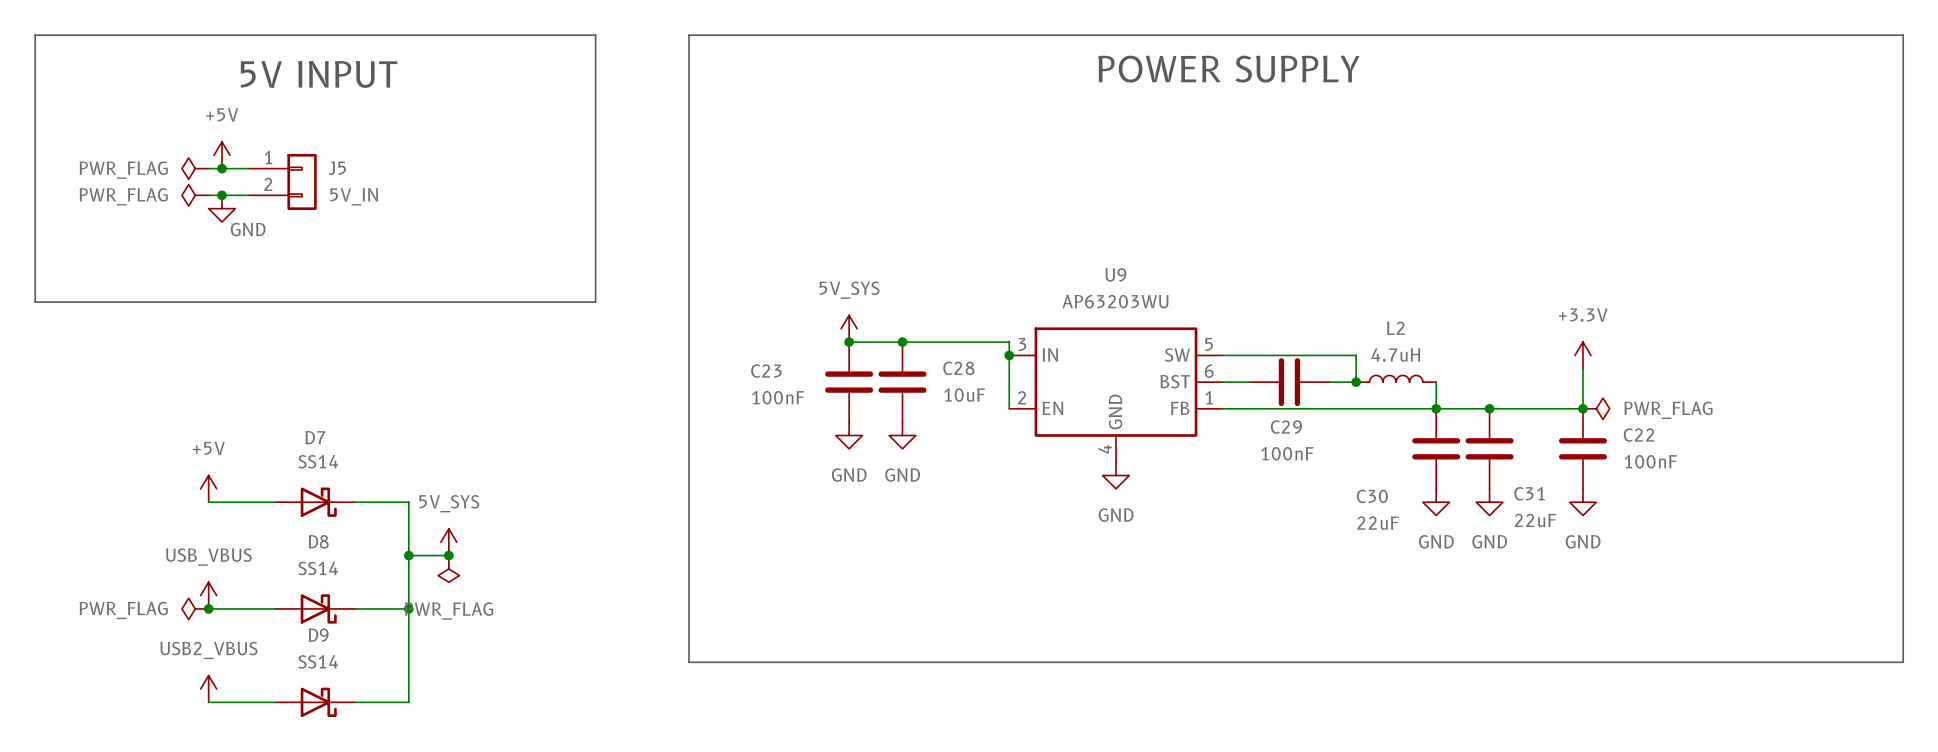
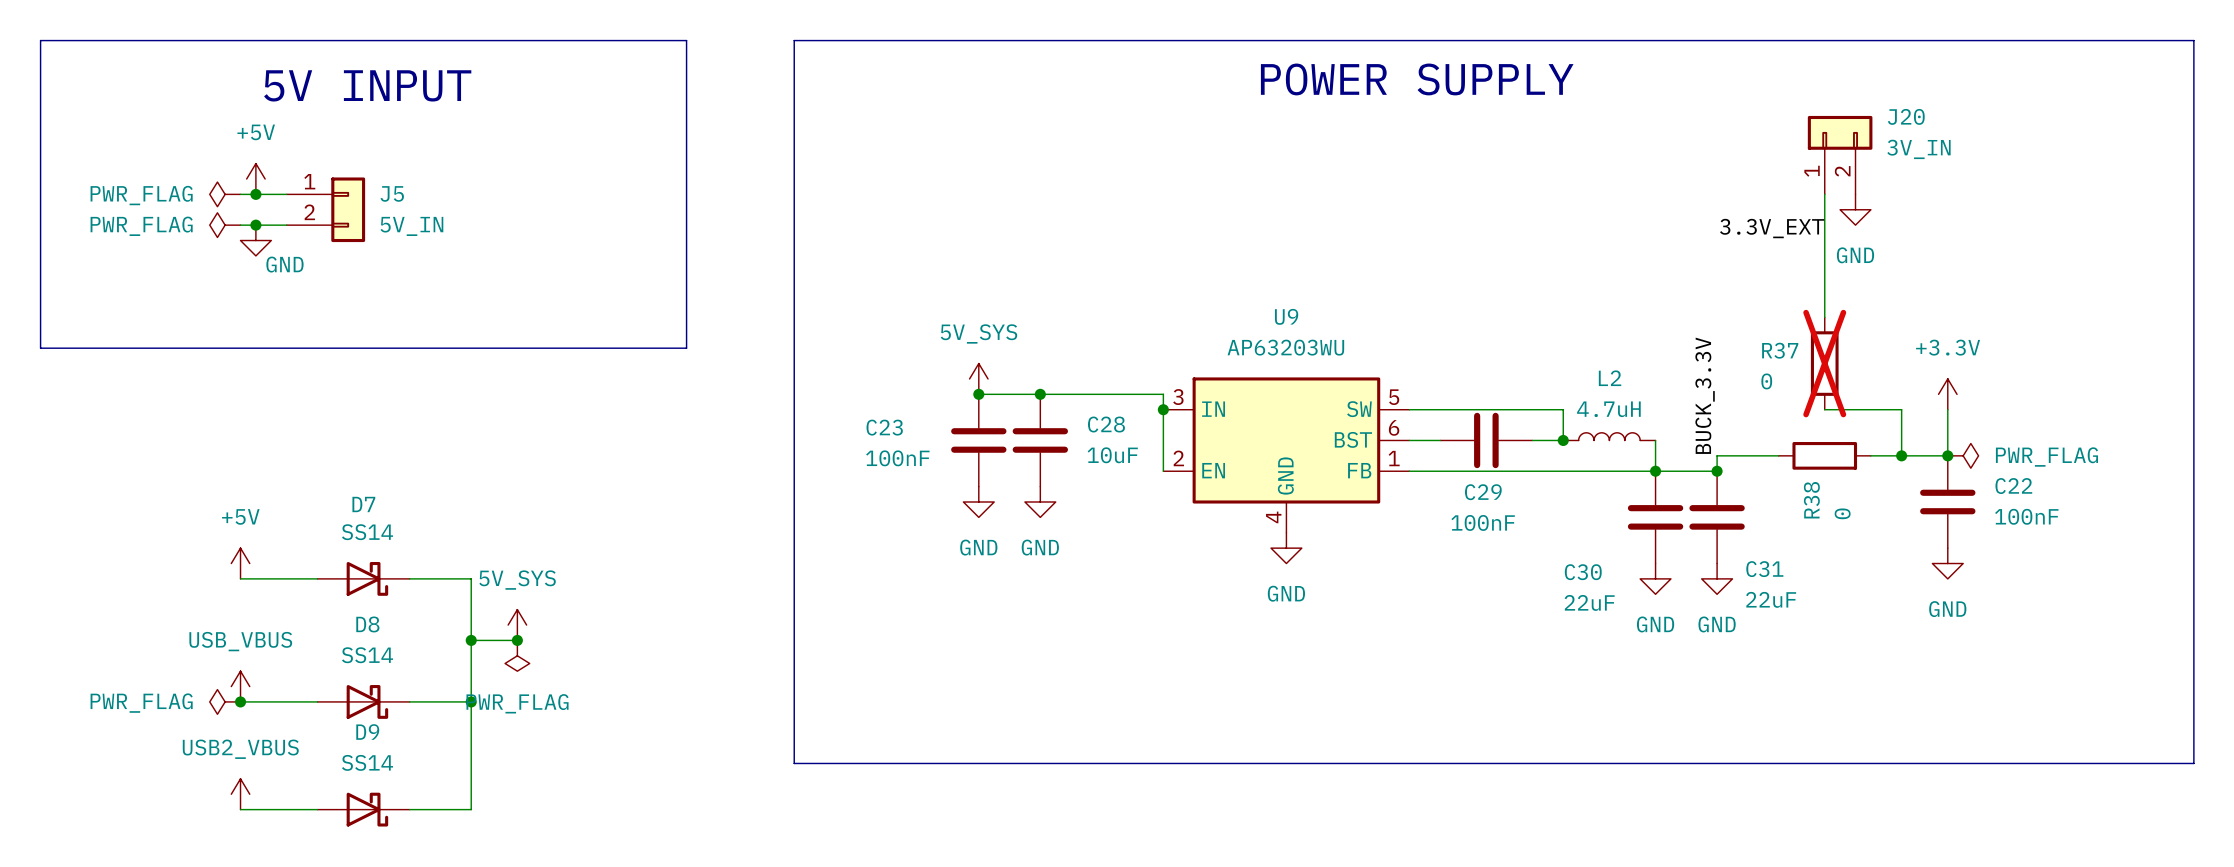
J20: none -> 3V_IN (1840, 155)
wire: none -> (1824, 194) (1824, 317)
power symbol: none -> GND (1855, 209)
label: none -> 3.3V_EXT (1772, 228)
R37: none -> 0 (1824, 363)
label: none -> BUCK_3.3V (1705, 395)
wire: none -> (1824, 409) (1901, 409) (1901, 455)
power symbol position: +3.3V (1582, 355) -> +3.3V (1947, 394)
wire: none -> (1947, 409) (1947, 455) (1870, 455)
wire: (1582, 368) (1582, 408) (1489, 408) -> (1778, 455) (1717, 455) (1717, 471)
R38: none -> 0 (1824, 455)
junction: none -> (1901, 455)
junction: none -> (1947, 455)
junction: (1582, 408) -> none
power symbol position: PWR_FLAG (1596, 408) -> PWR_FLAG (1963, 455)
C22 position: (1582, 448) -> (1947, 502)
power symbol position: GND (1582, 502) -> GND (1947, 563)

